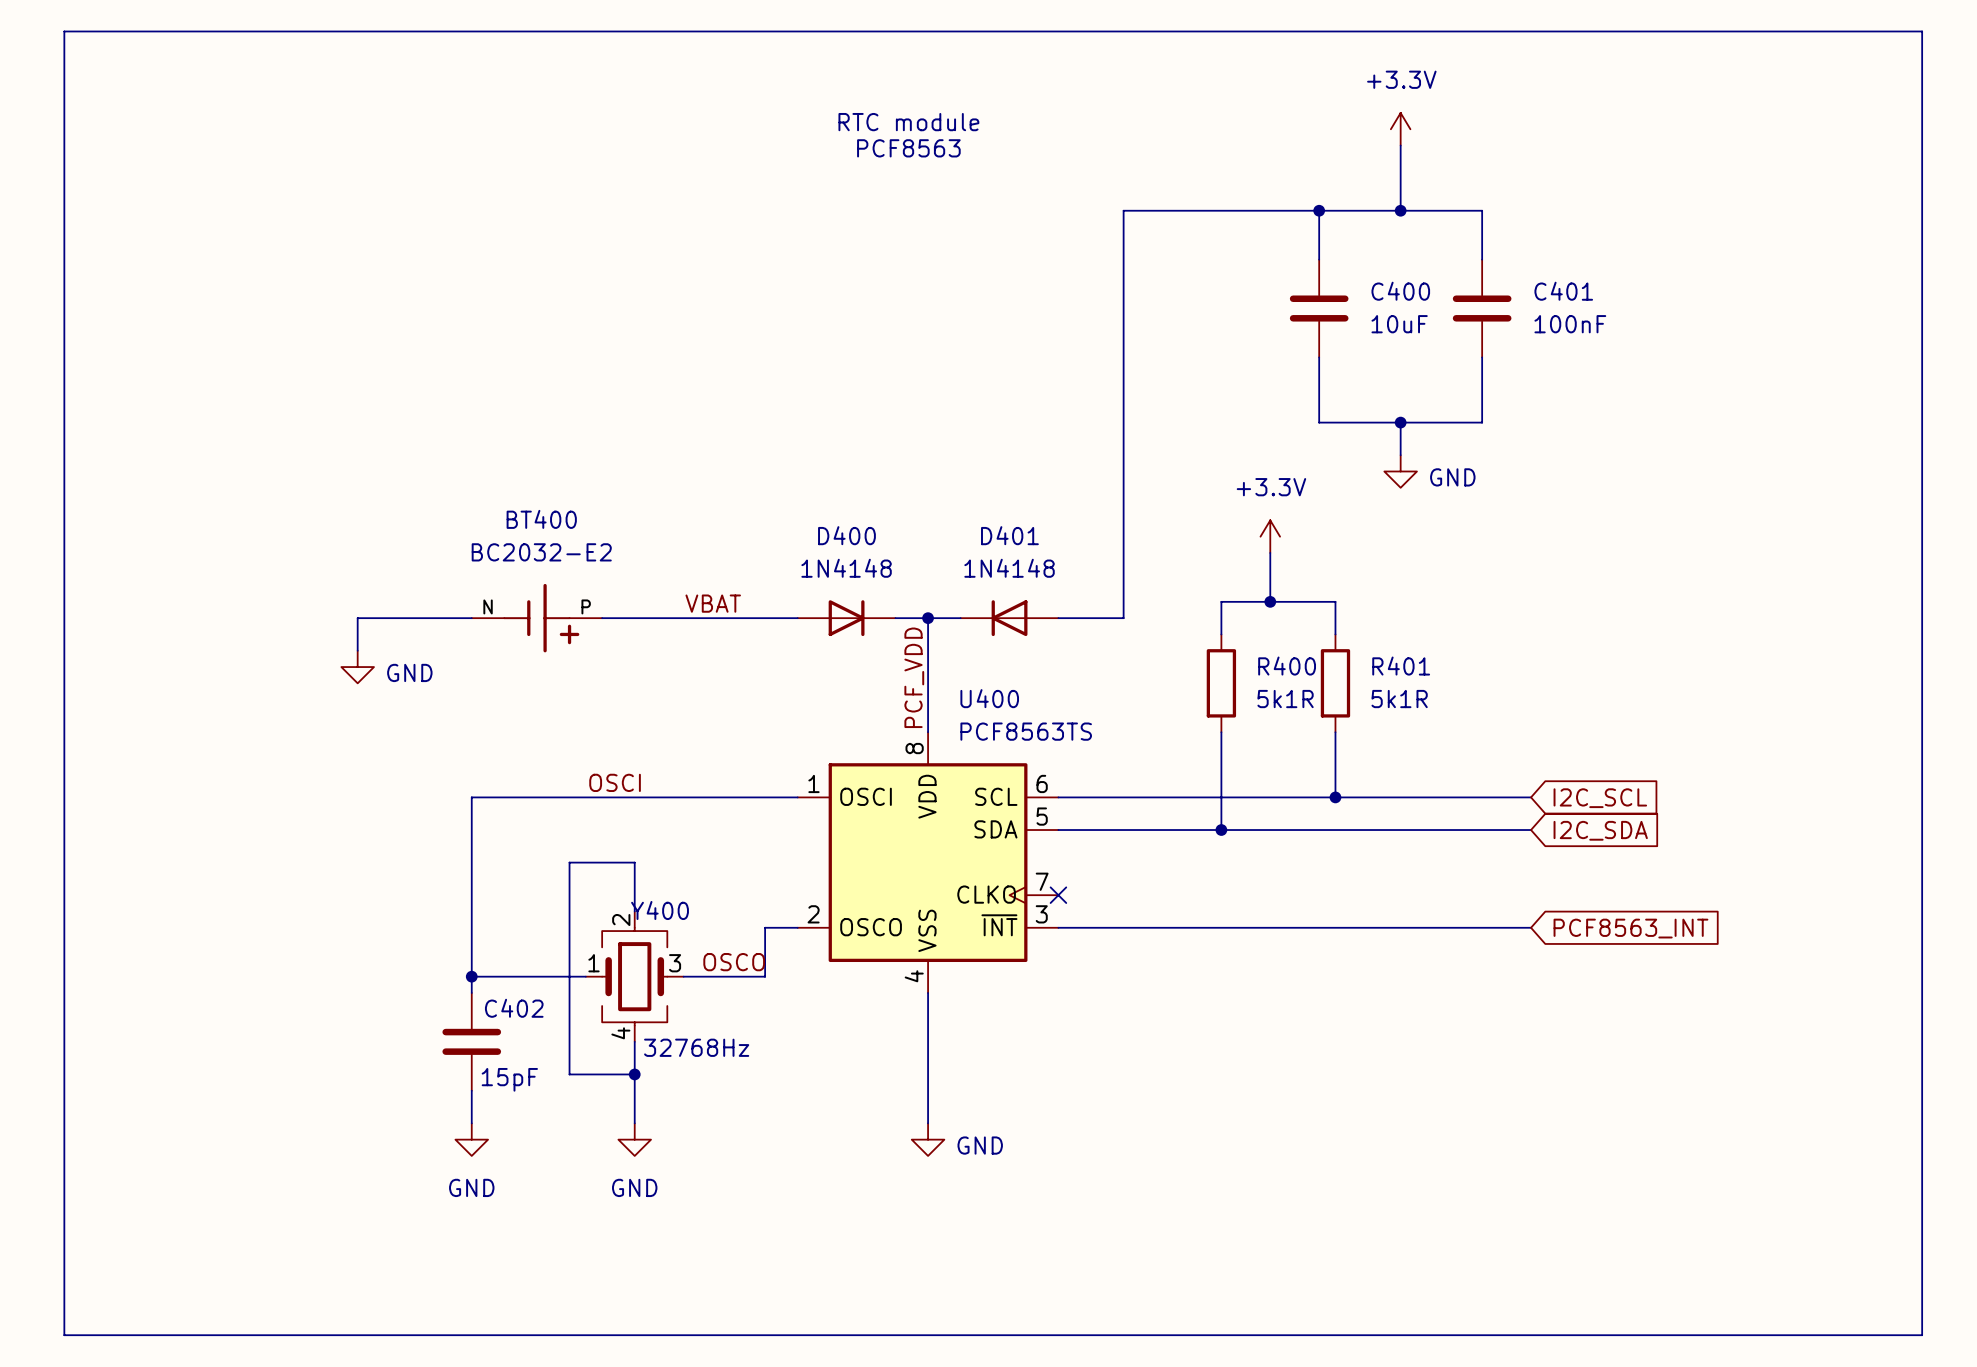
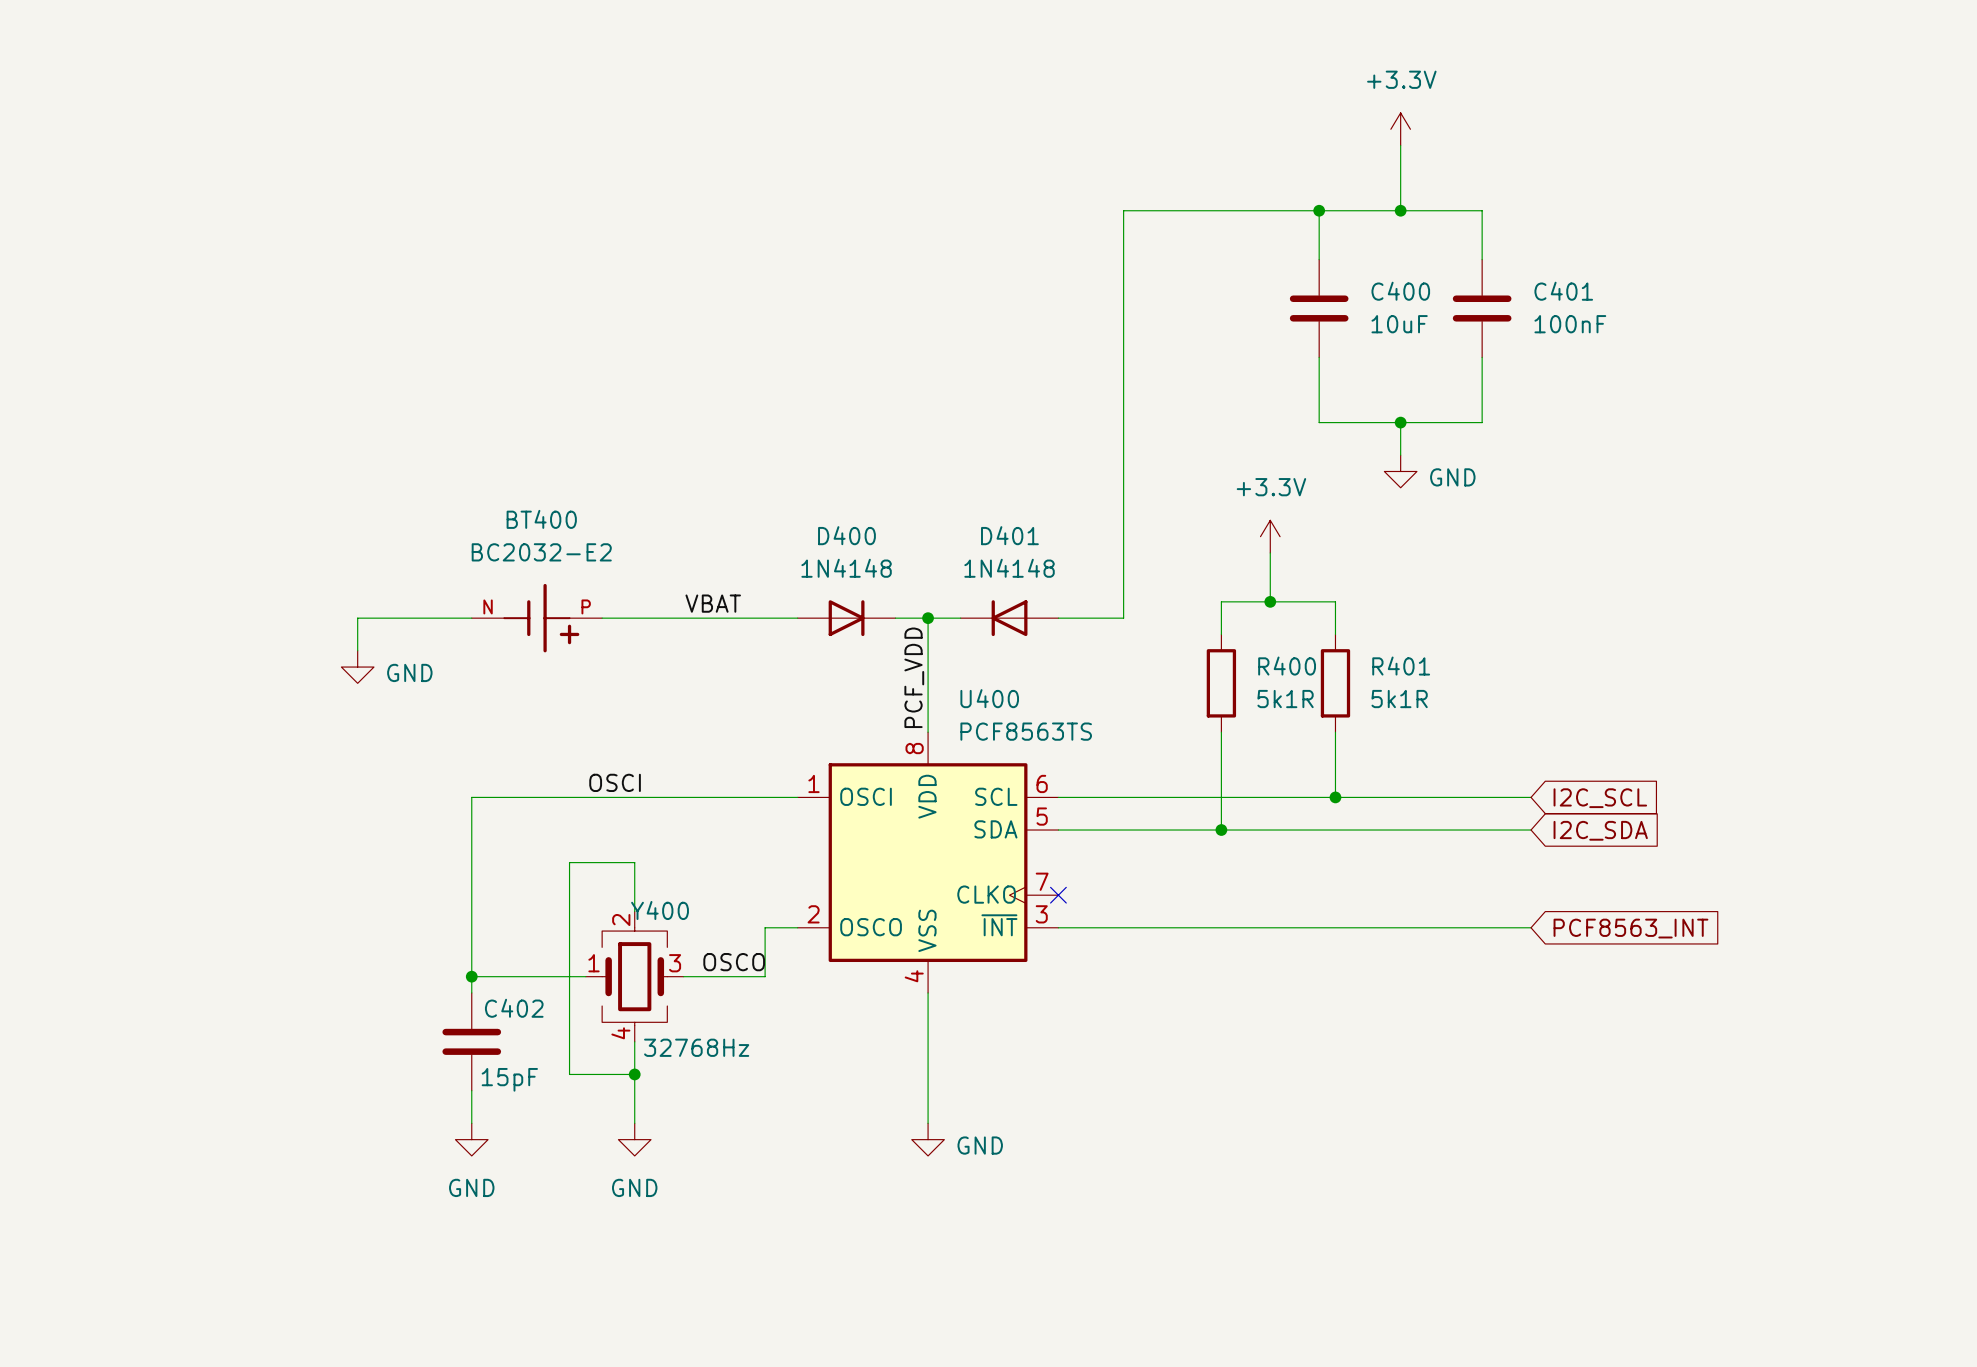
line: (64, 31) (1922, 31) (1922, 1335) (64, 1335) (64, 31) -> none
text: RTC module (908, 122) -> none
text: PCF8563 (908, 148) -> none

